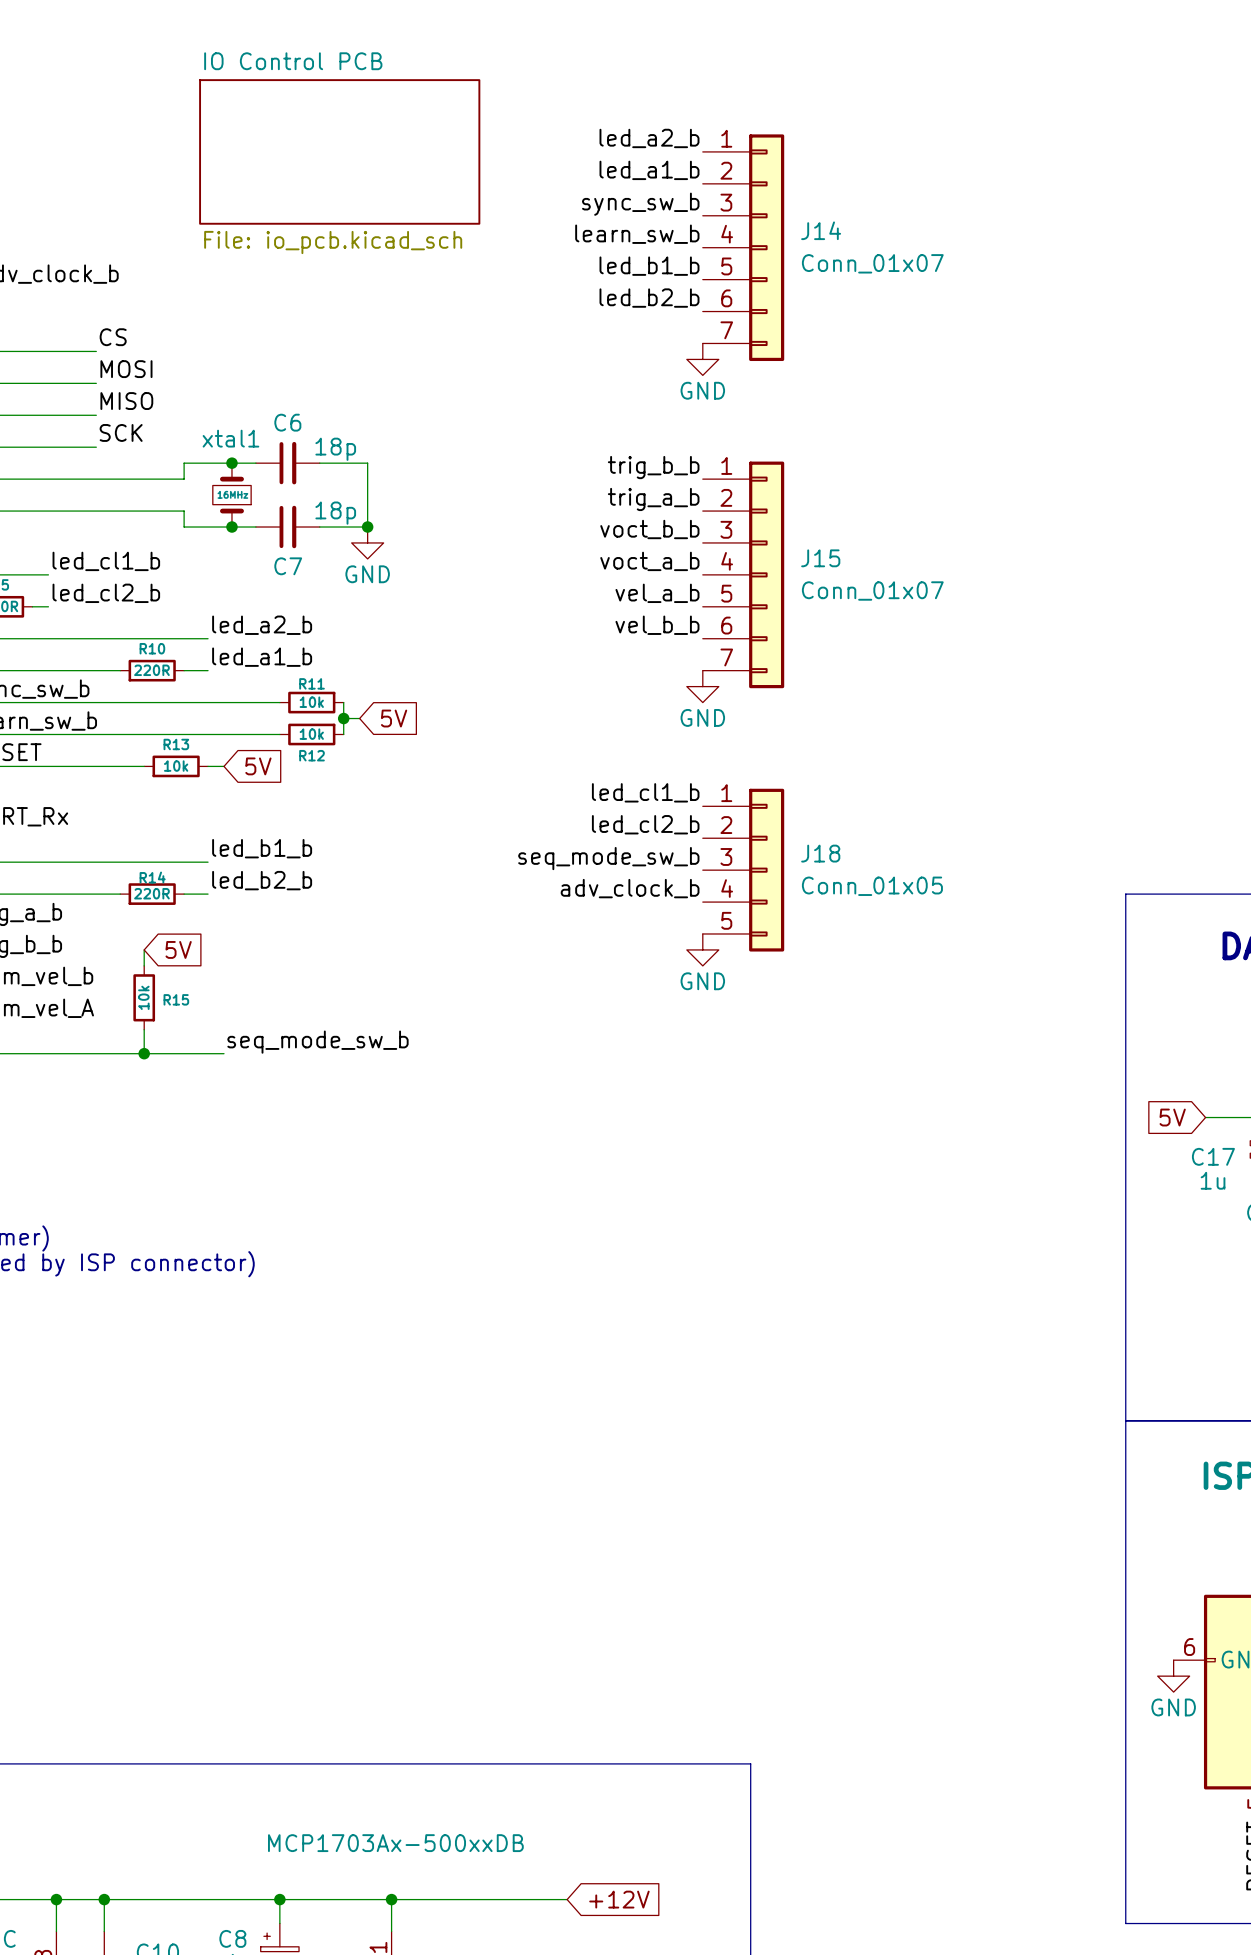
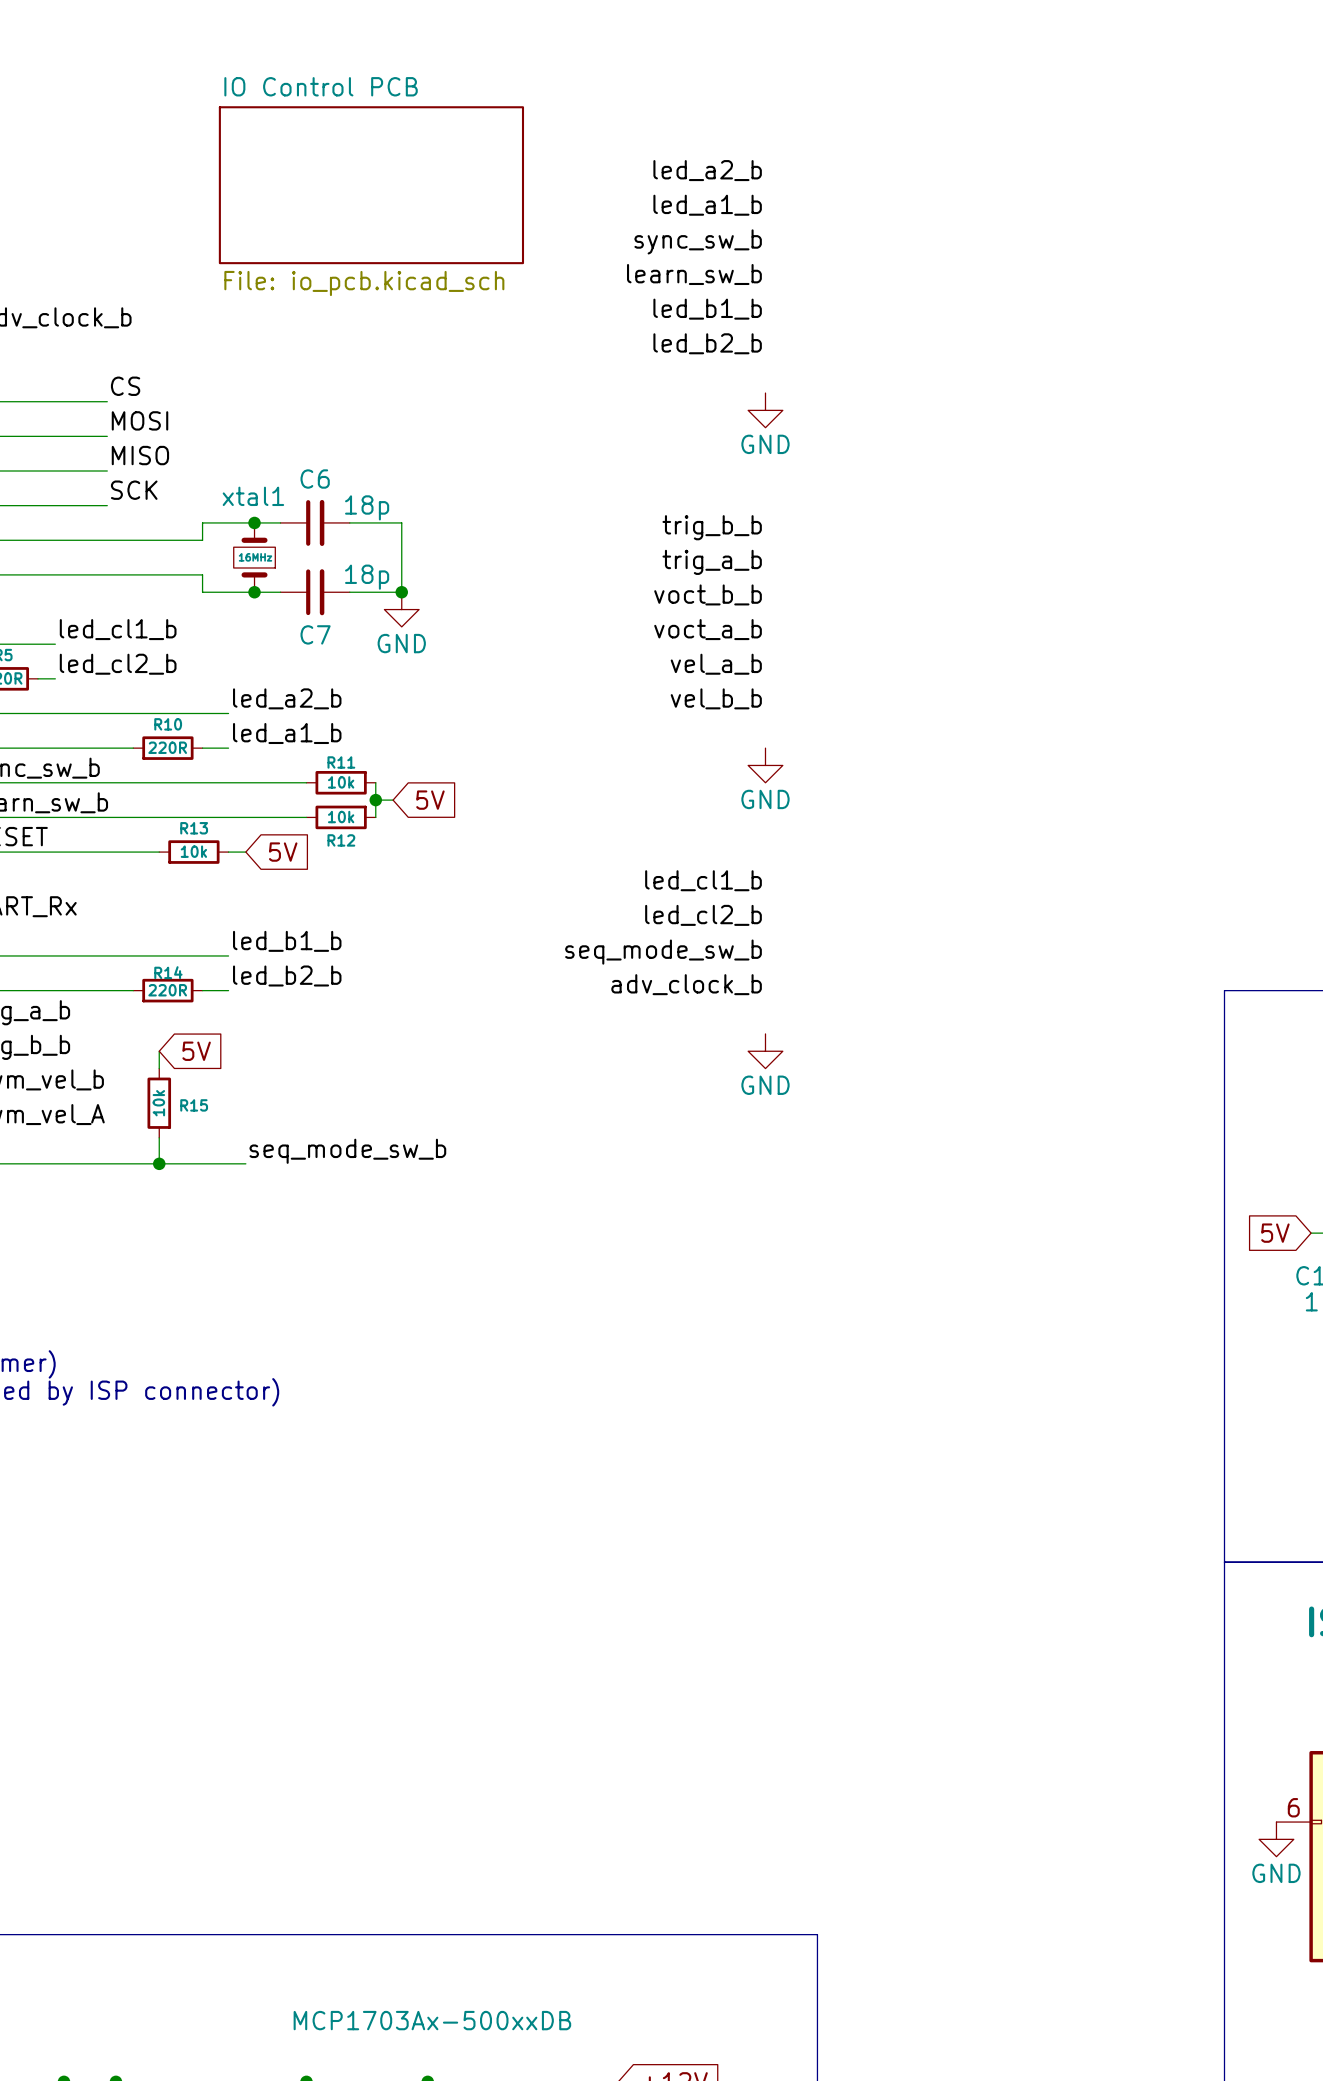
J14: Conn_01x07 (743, 247) -> none
J15: Conn_01x07 (743, 574) -> none
J18: Conn_01x05 (743, 870) -> none

